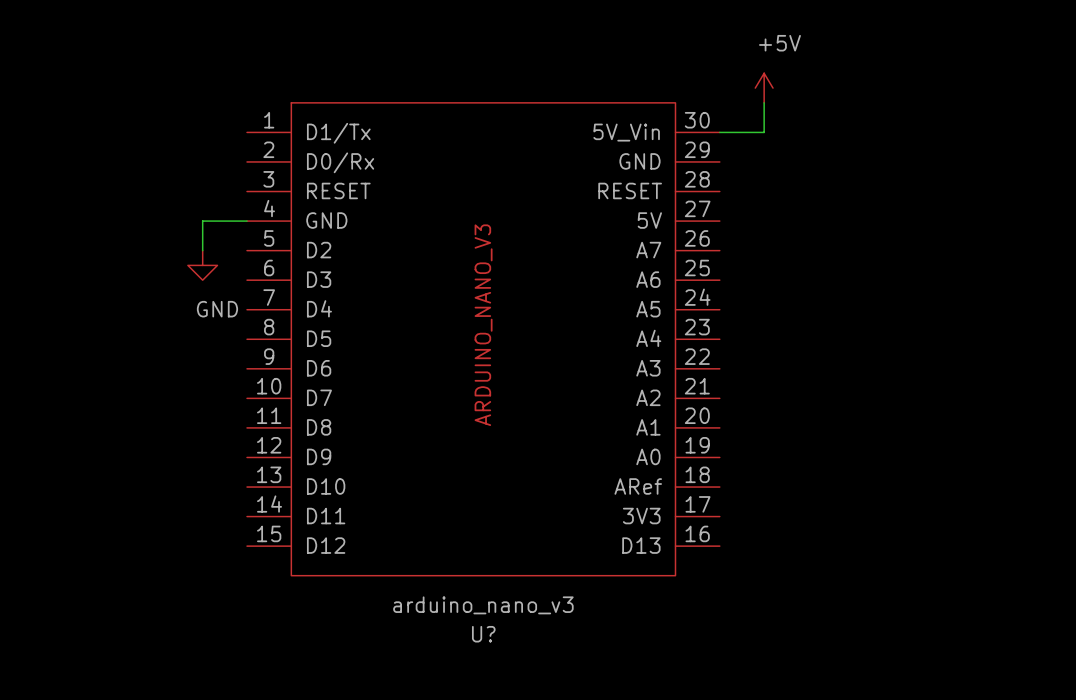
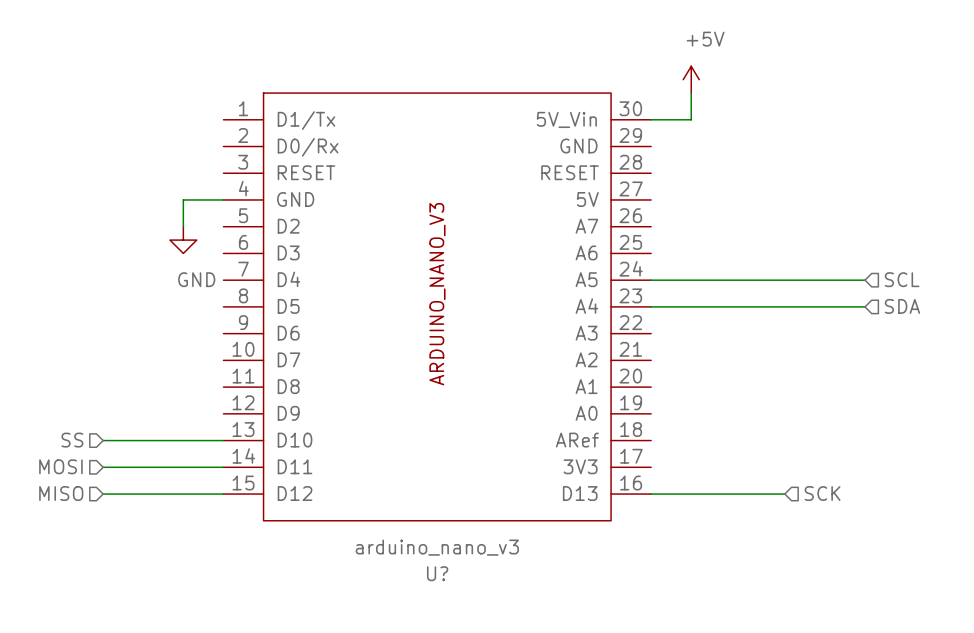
wire: none -> (651, 280) (865, 280)
hierarchical label: none -> SCL (902, 279)
hierarchical label: none -> SDA (902, 306)
wire: none -> (651, 306) (865, 306)
hierarchical label: none -> SS (72, 440)
wire: none -> (103, 440) (223, 440)
hierarchical label: none -> MOSI (60, 466)
wire: none -> (103, 467) (223, 467)
hierarchical label: none -> MISO (61, 493)
hierarchical label: none -> SCK (822, 493)
wire: none -> (103, 494) (223, 494)
wire: none -> (651, 494) (784, 494)

